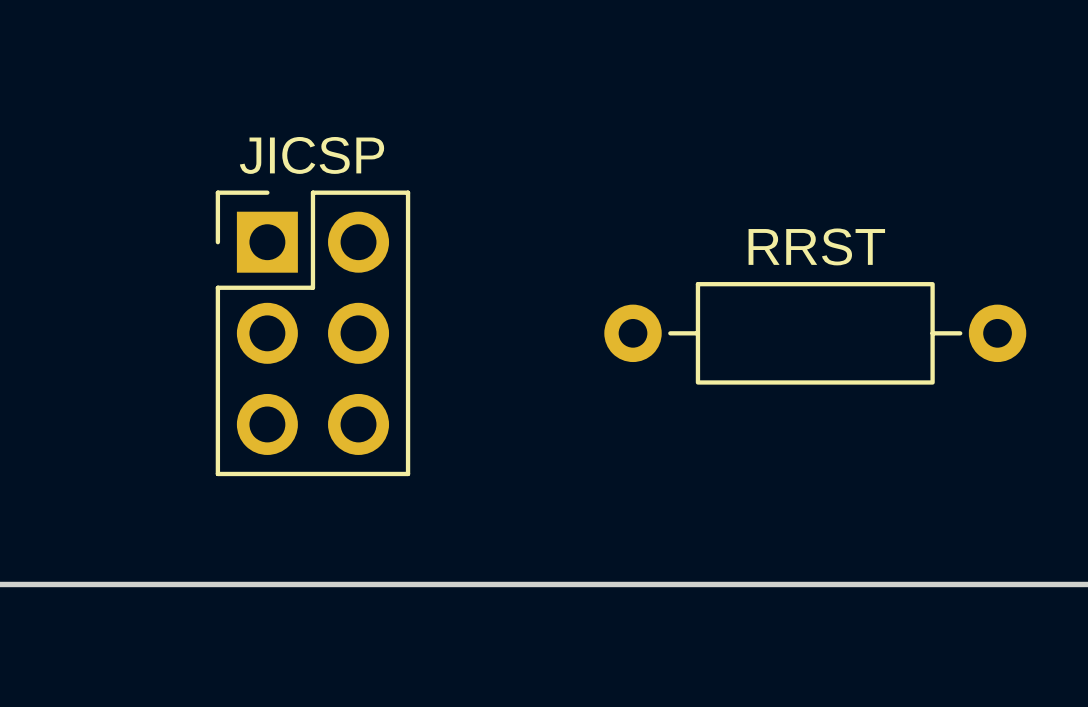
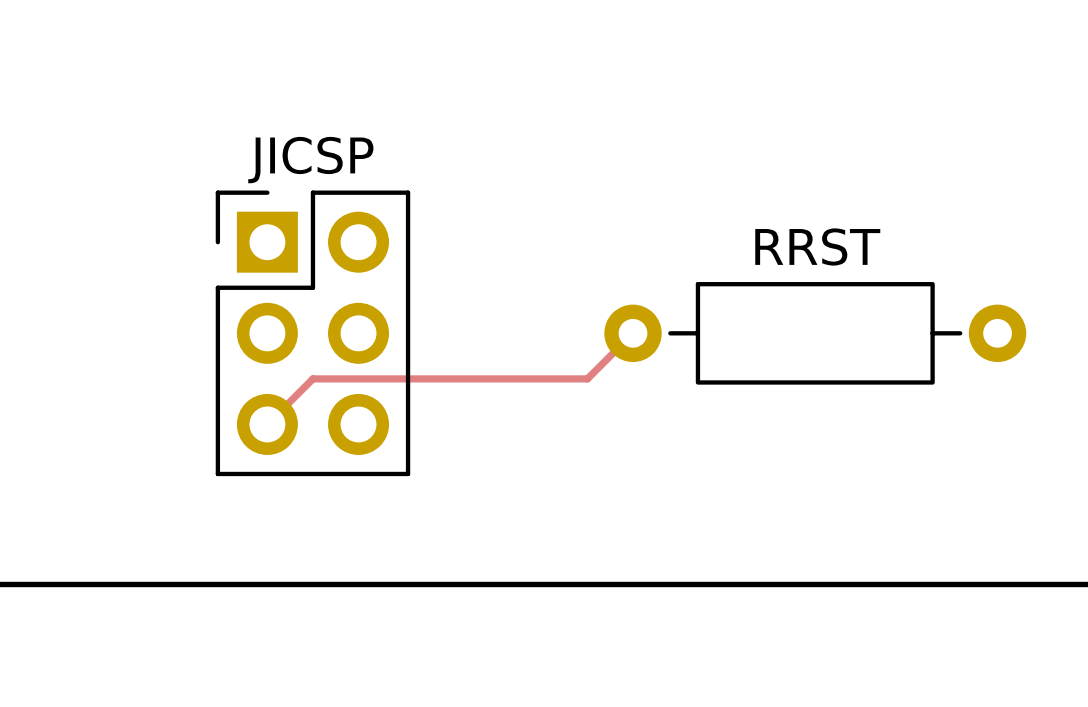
track: none -> (633, 333) (587, 378) (312, 378) (267, 424)

